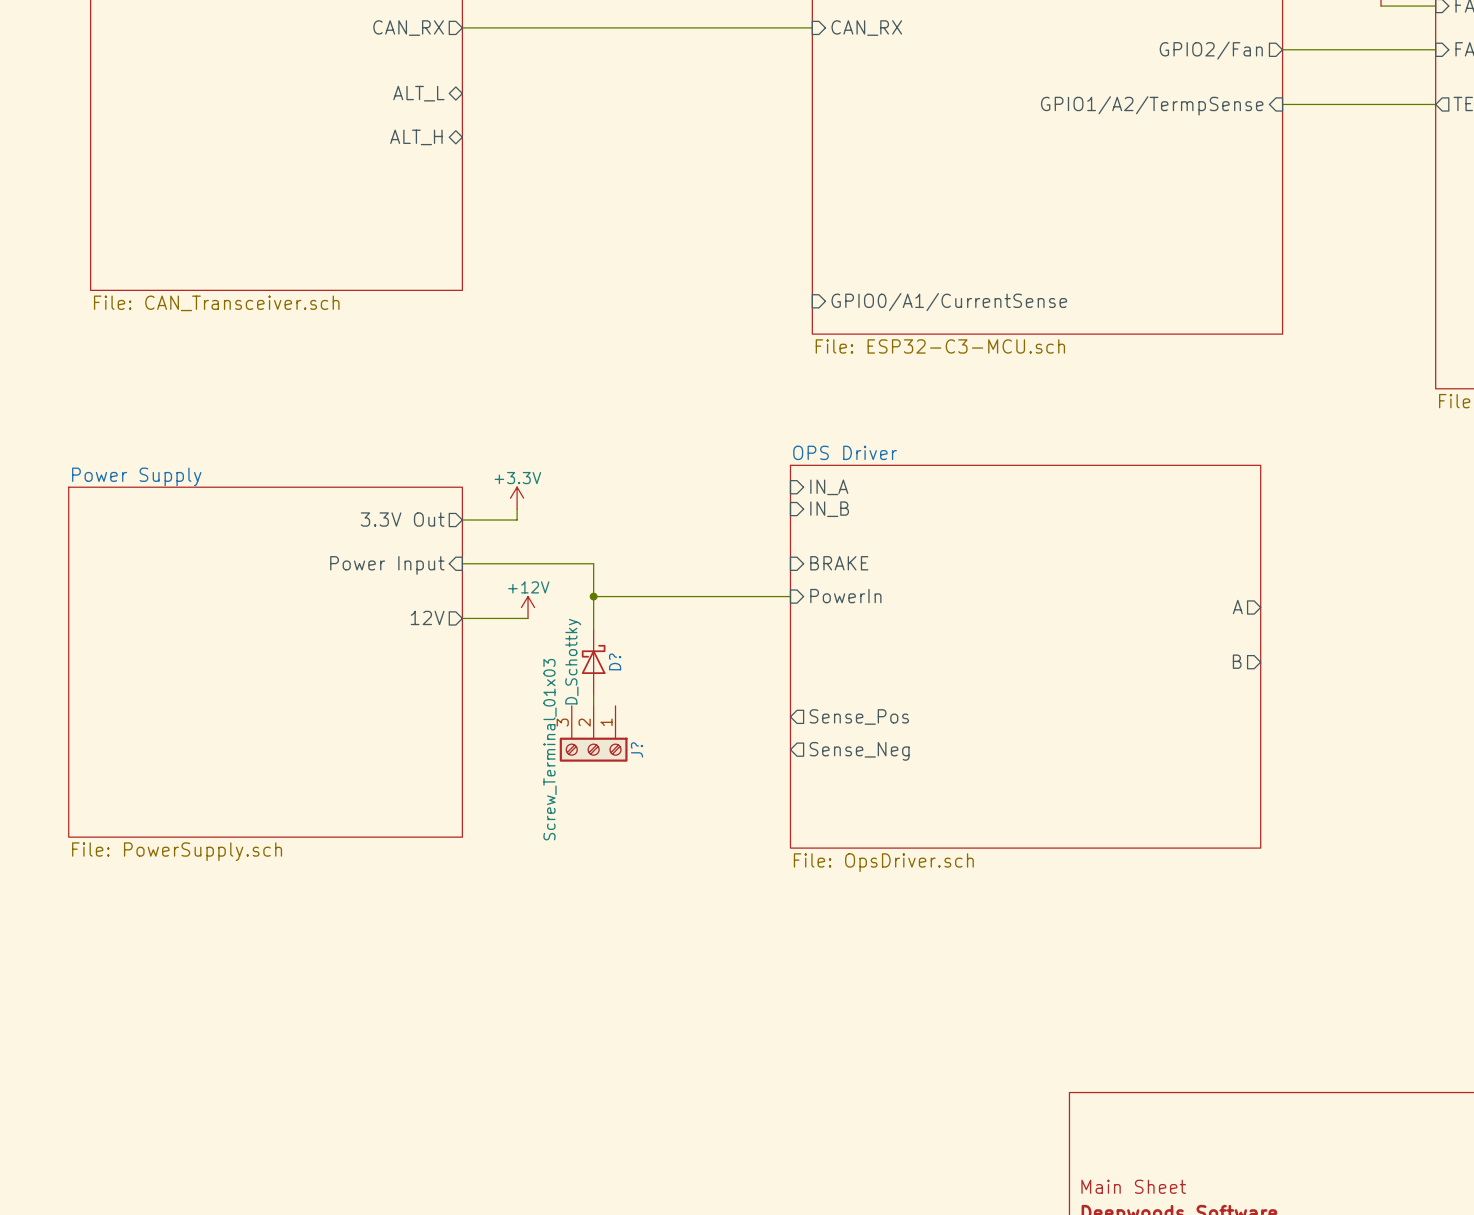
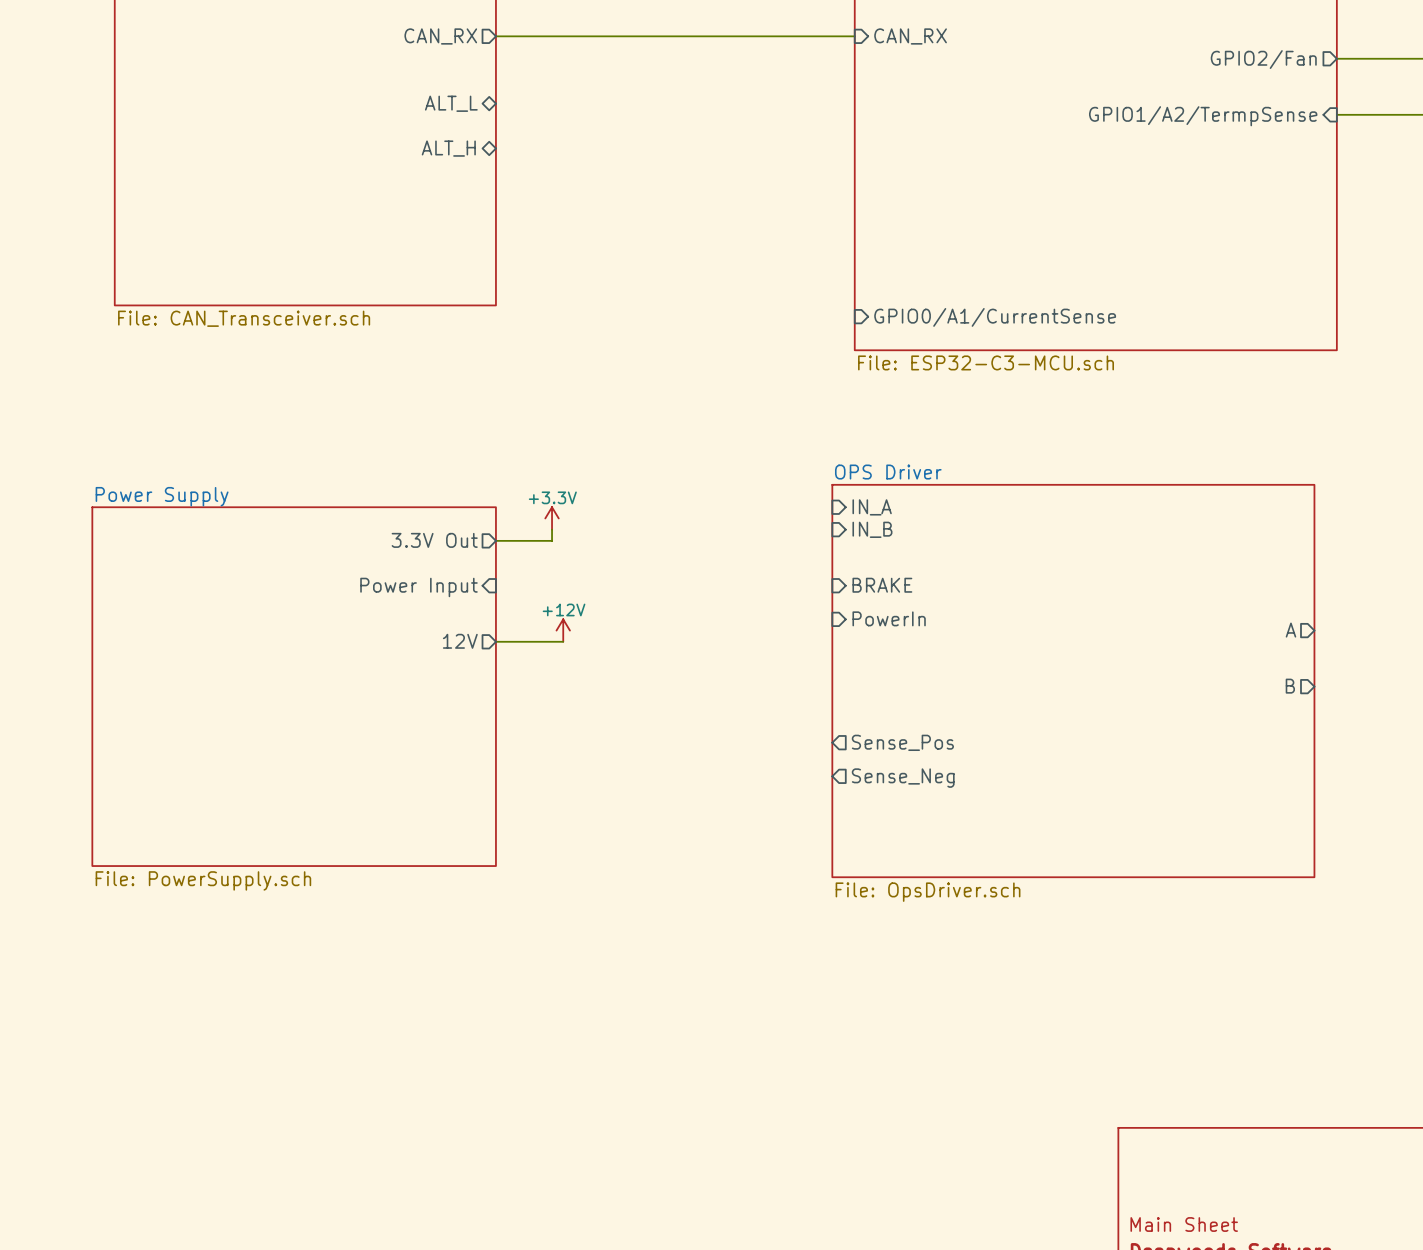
wire: (462, 563) (593, 563) (593, 629) -> none
wire: (593, 596) (790, 596) -> none
junction: (593, 596) -> none
D?: D_Schottky (593, 662) -> none
wire: (593, 694) (593, 705) -> none
J?: Screw_Terminal_01x03 (593, 733) -> none

